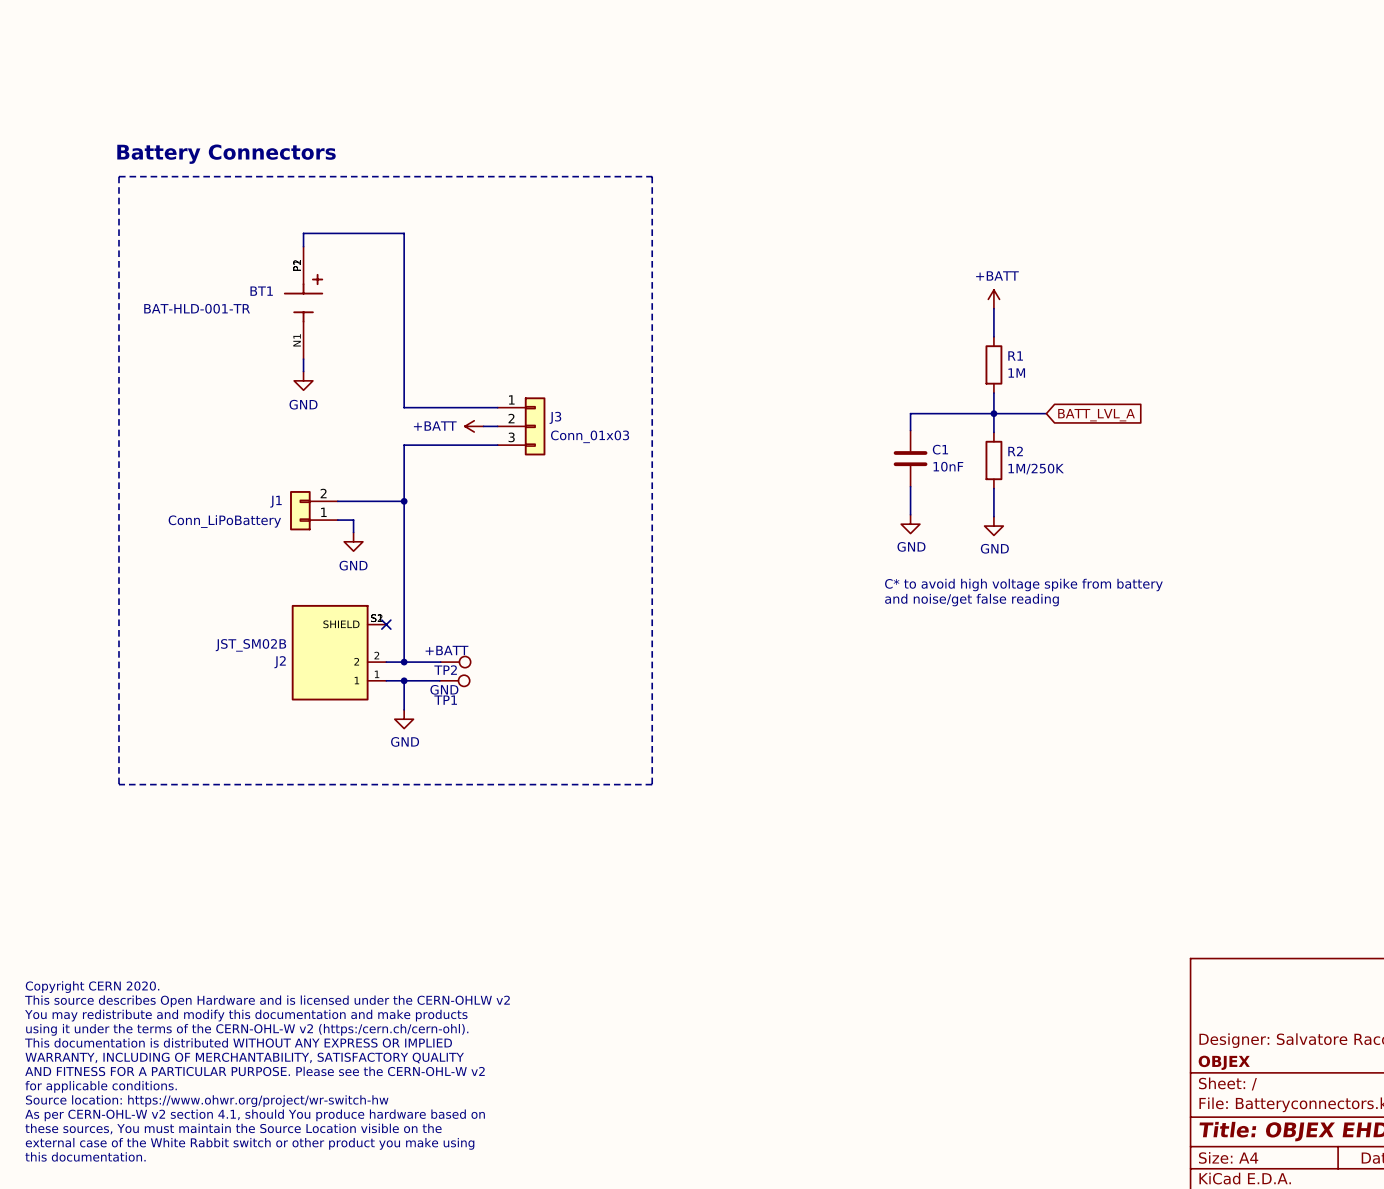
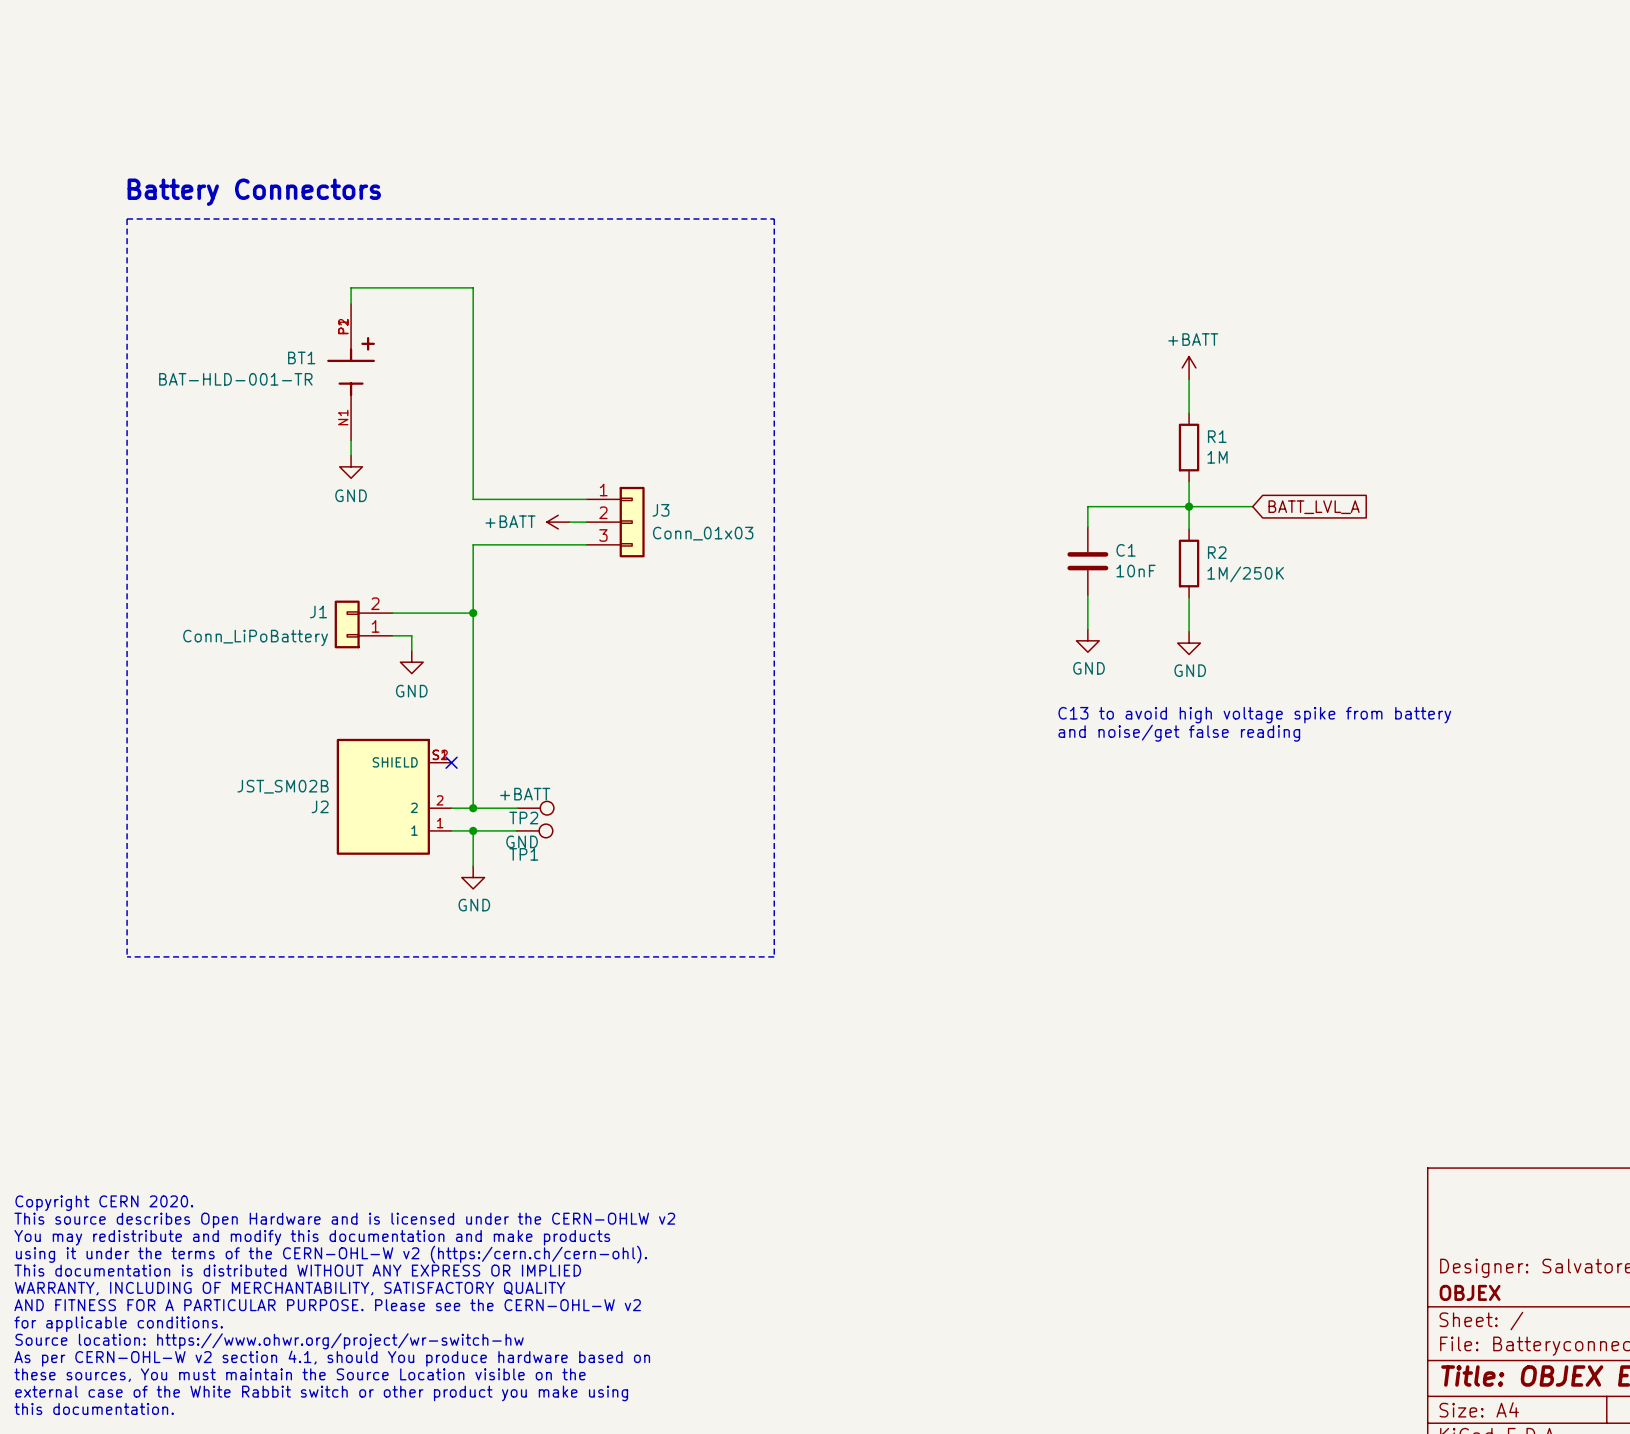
text: C* to avoid high voltage spike from battery (1023, 585) -> C13 to avoid high voltage spike from battery (1254, 715)

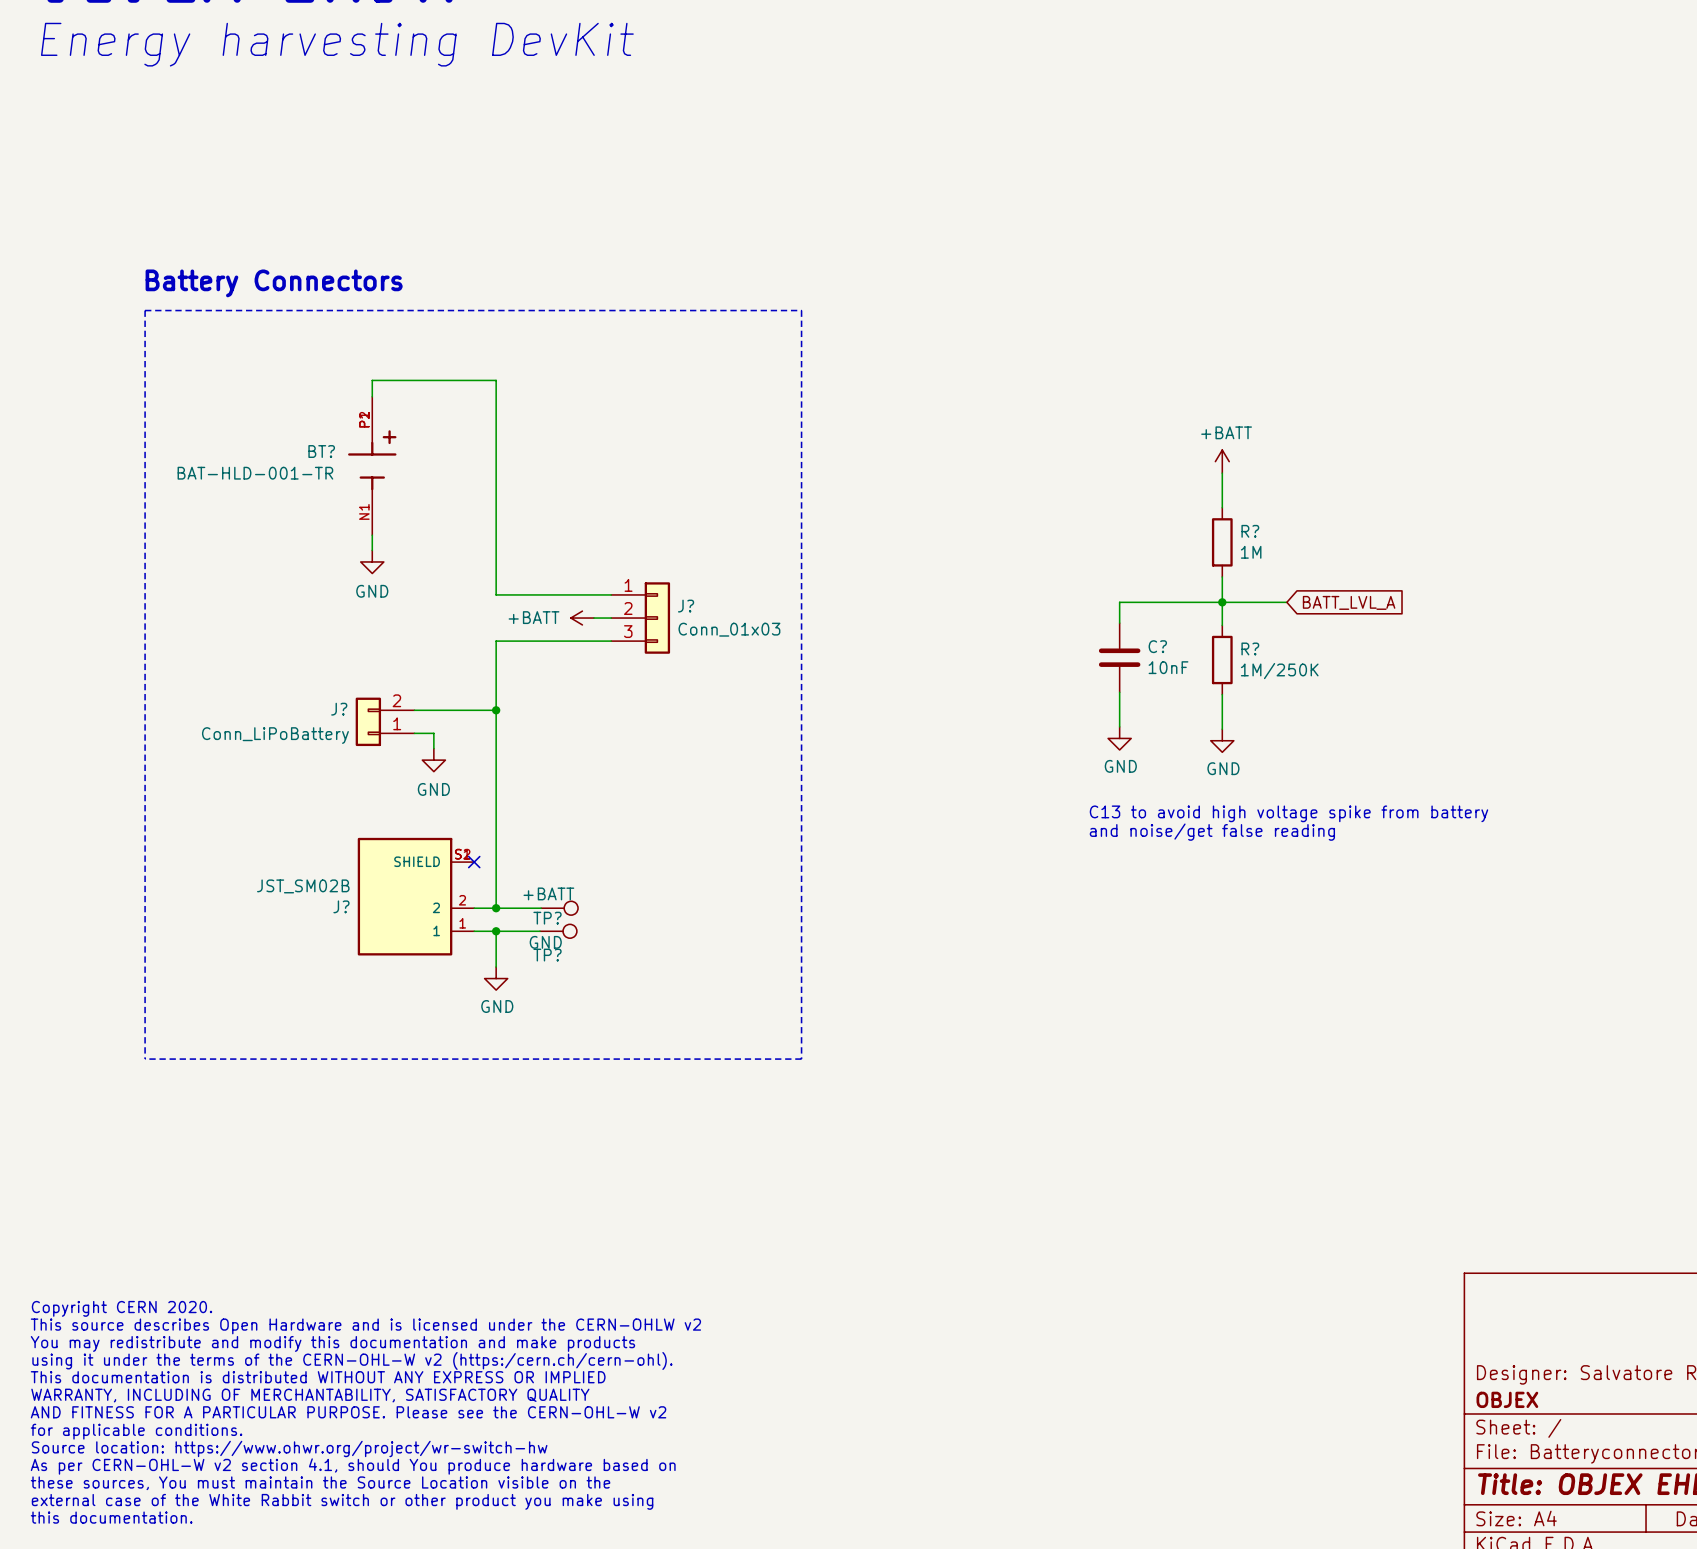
BT1 name: BT1 (301, 357) -> BT? (321, 451)
R1 name: R1 (1217, 436) -> R? (1250, 531)
J3 name: J3 (660, 510) -> J? (686, 606)
C1 name: C1 (1126, 550) -> C? (1157, 646)
R2 name: R2 (1217, 552) -> R? (1250, 648)
J1 name: J1 (318, 611) -> J? (339, 709)
J2 name: J2 (320, 806) -> J? (341, 906)
TP2 name: TP2 (523, 818) -> TP? (547, 918)
TP1 name: TP1 (523, 854) -> TP? (547, 955)

